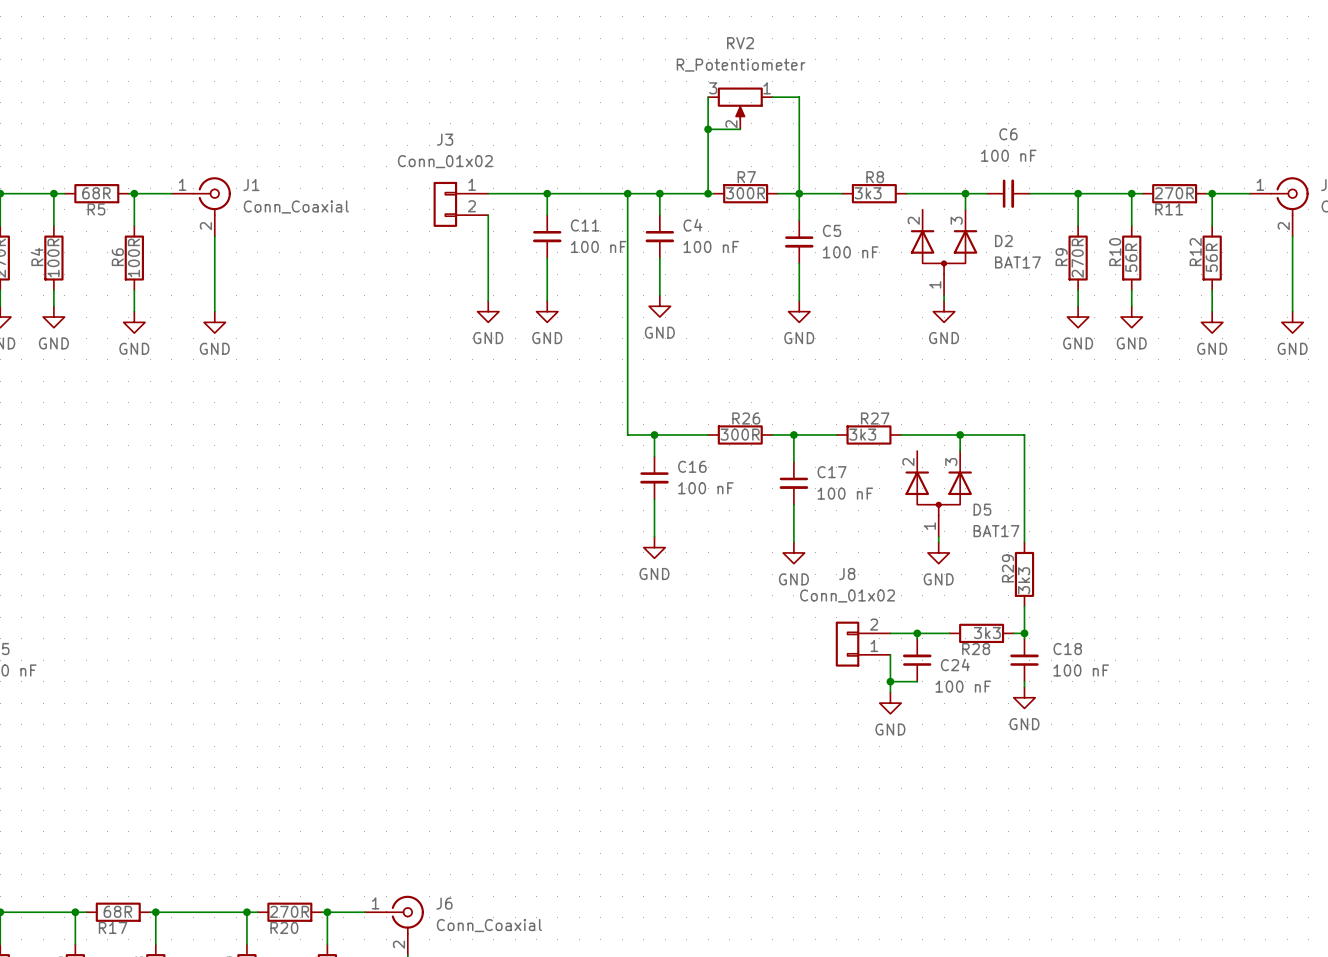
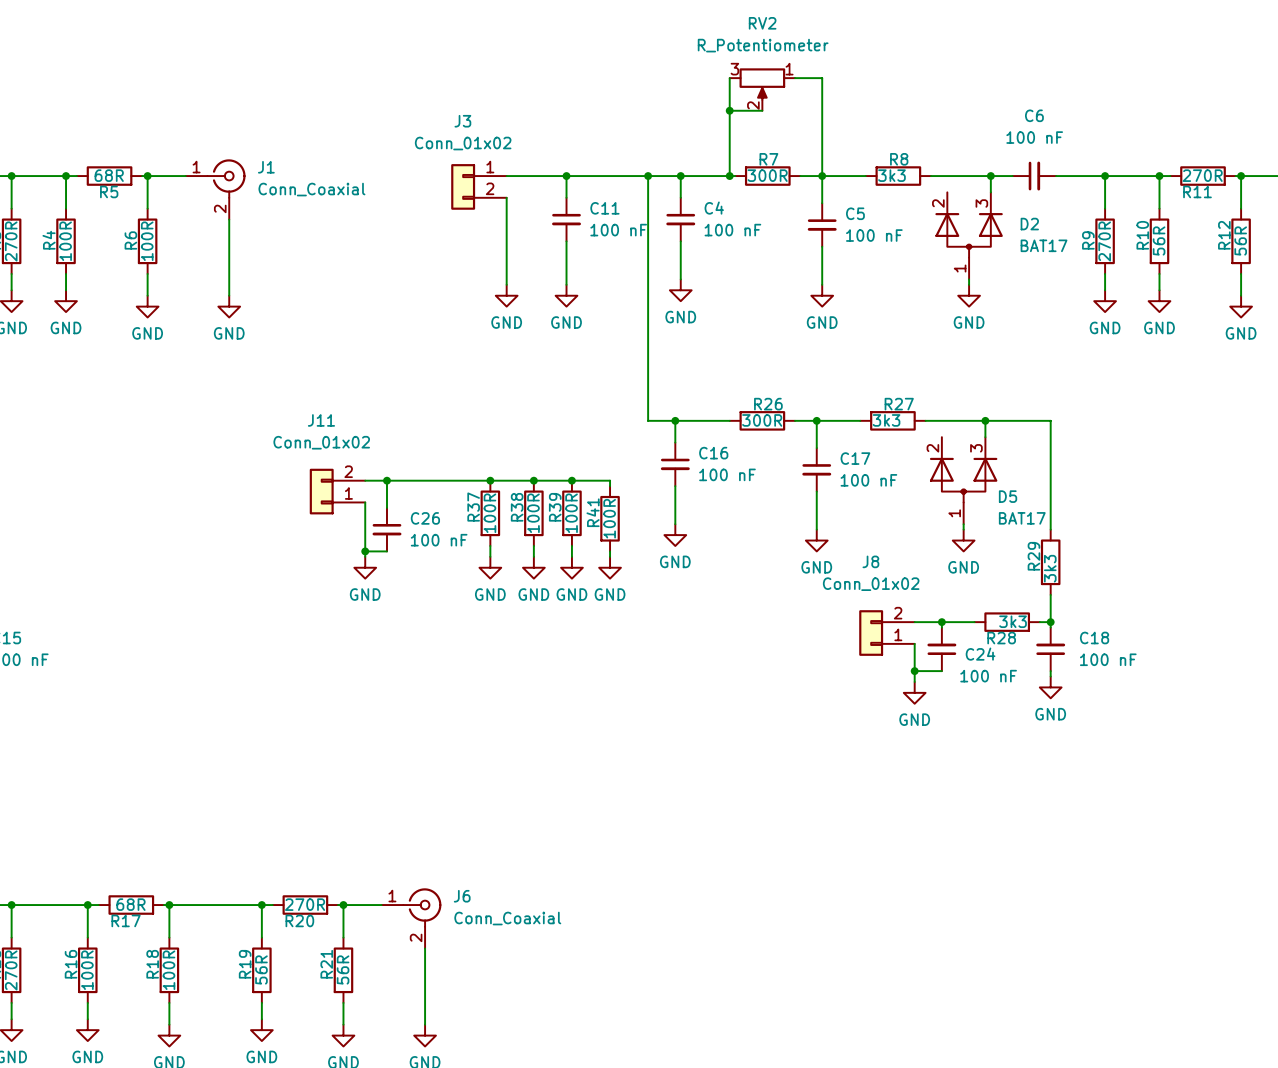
wire: none -> (365, 480) (610, 480) (610, 486)
wire: none -> (386, 480) (386, 507)
junction: none -> (386, 480)
junction: none -> (490, 480)
junction: none -> (533, 480)
junction: none -> (571, 480)
J11: none -> Conn_01x02 (337, 491)
wire: none -> (365, 502) (365, 556)
R37: none -> 100R (490, 513)
R38: none -> 100R (533, 513)
R39: none -> 100R (571, 513)
R41: none -> 100R (610, 518)
C26: none -> 100 nF (386, 529)
wire: none -> (490, 545) (490, 556)
wire: none -> (533, 545) (533, 556)
wire: none -> (571, 545) (571, 556)
wire: none -> (365, 551) (386, 551)
junction: none -> (365, 551)
wire: none -> (610, 551) (610, 556)
power symbol: none -> GND (365, 567)
power symbol: none -> GND (490, 567)
power symbol: none -> GND (533, 567)
power symbol: none -> GND (571, 567)
power symbol: none -> GND (610, 567)

